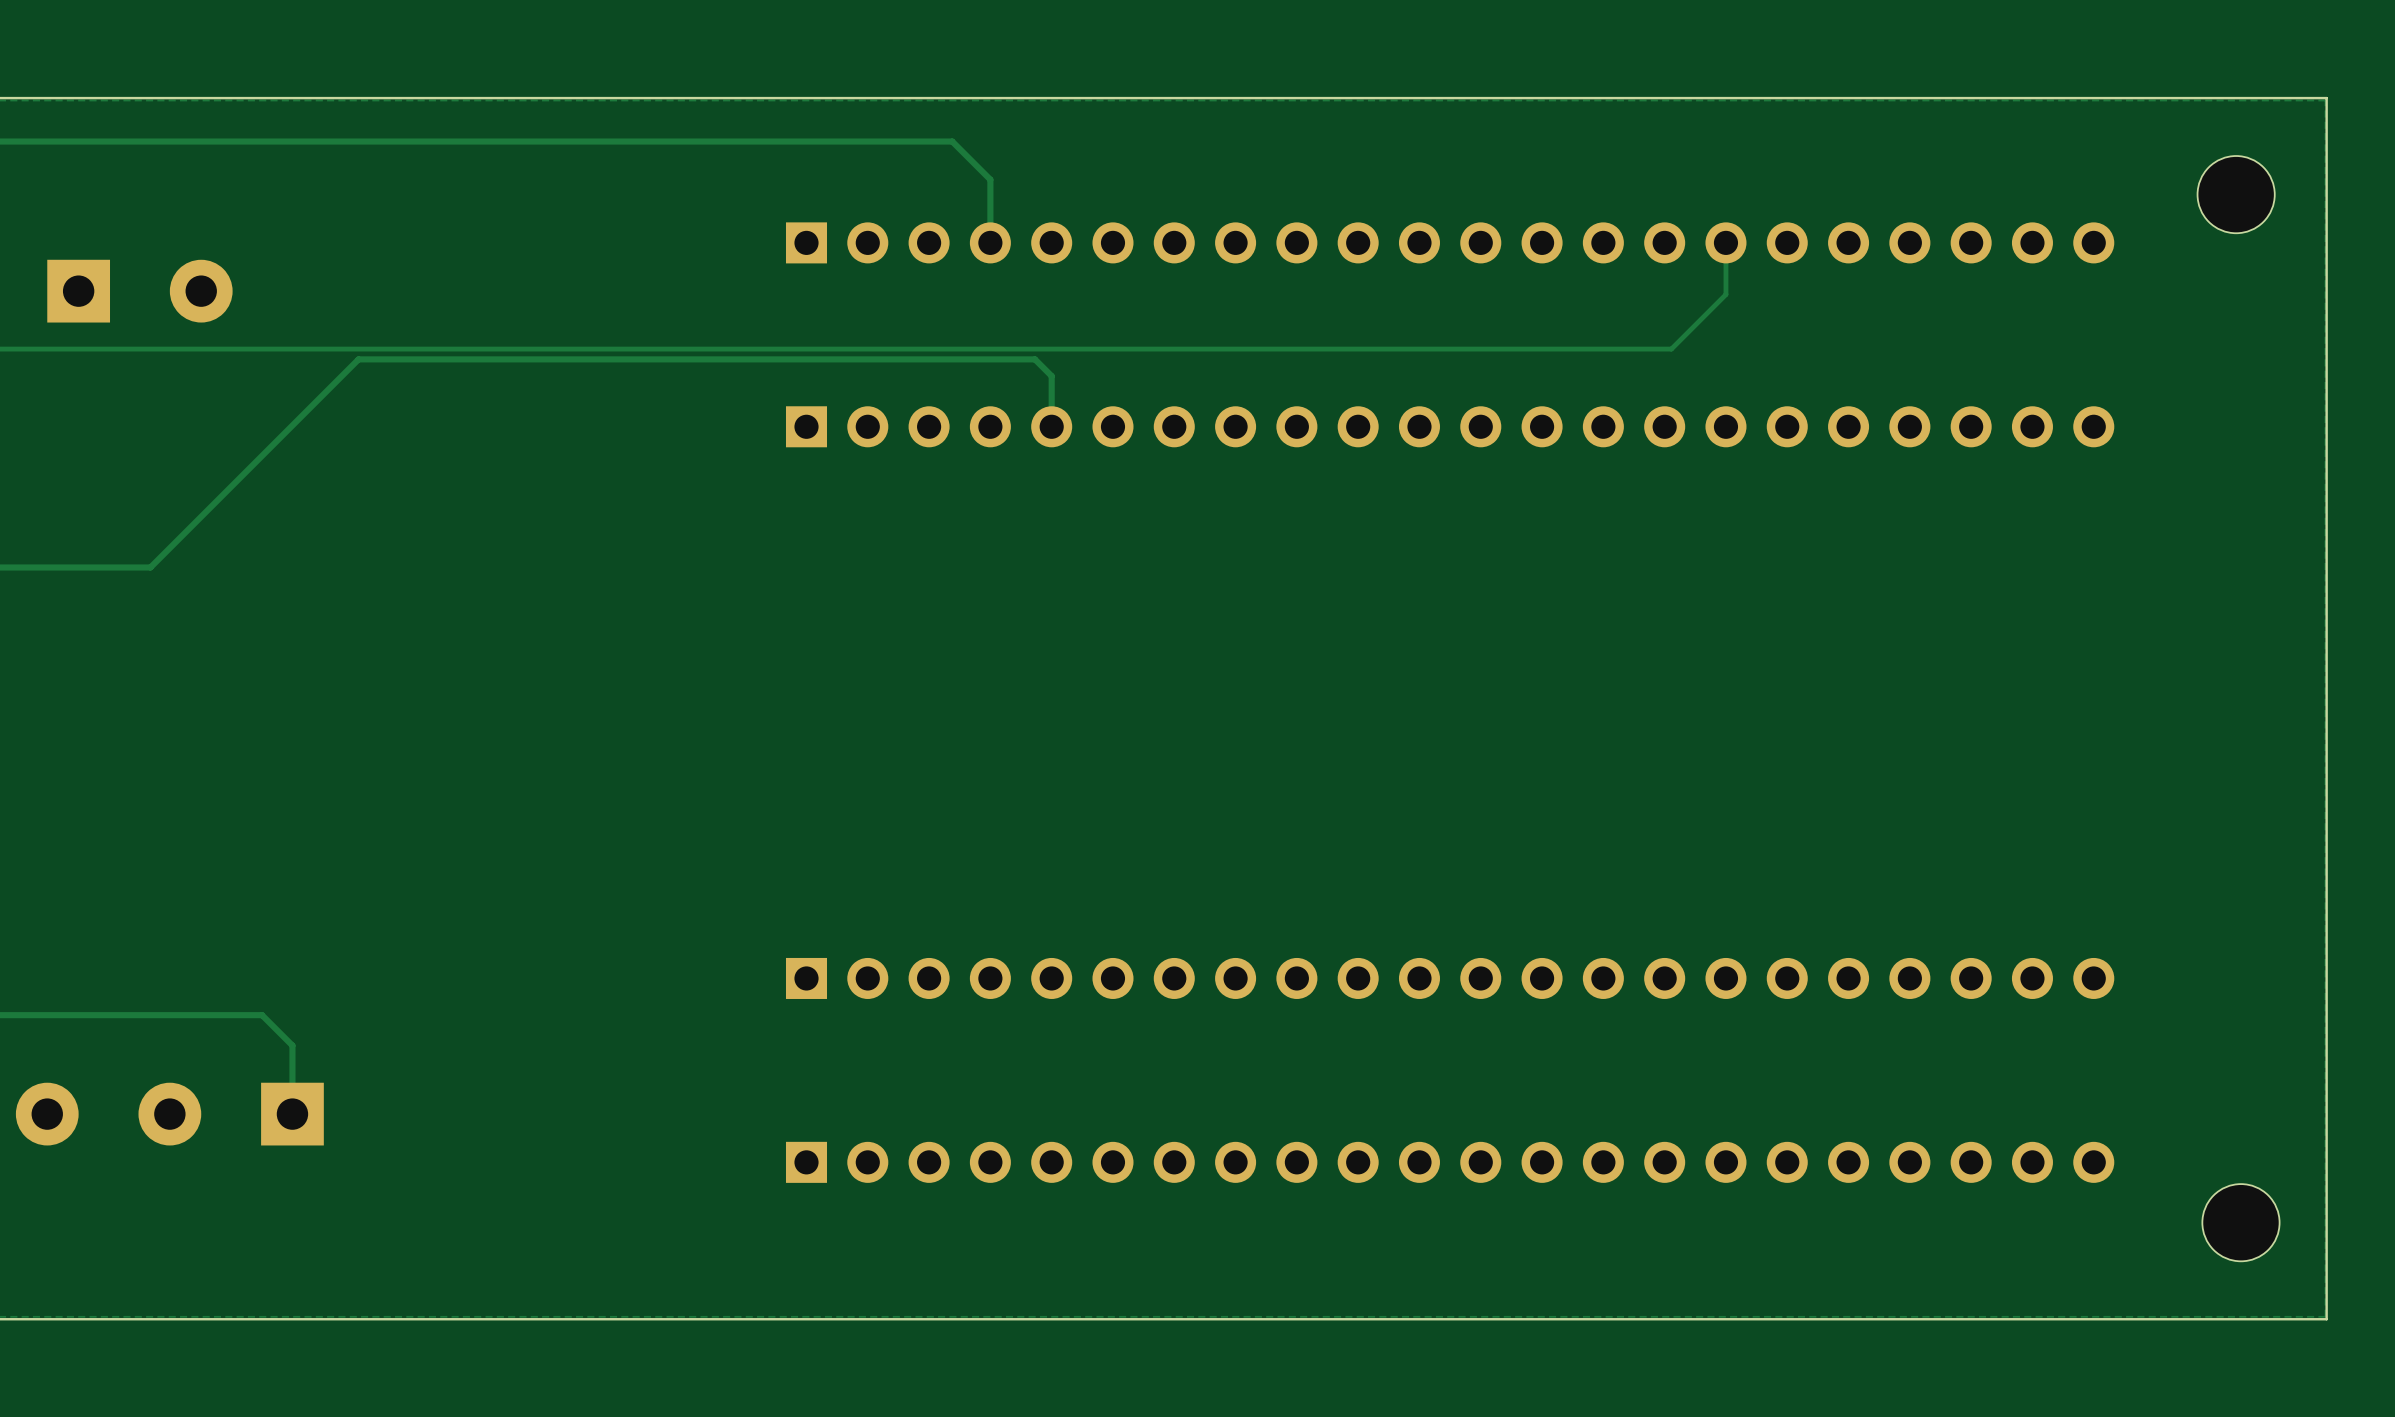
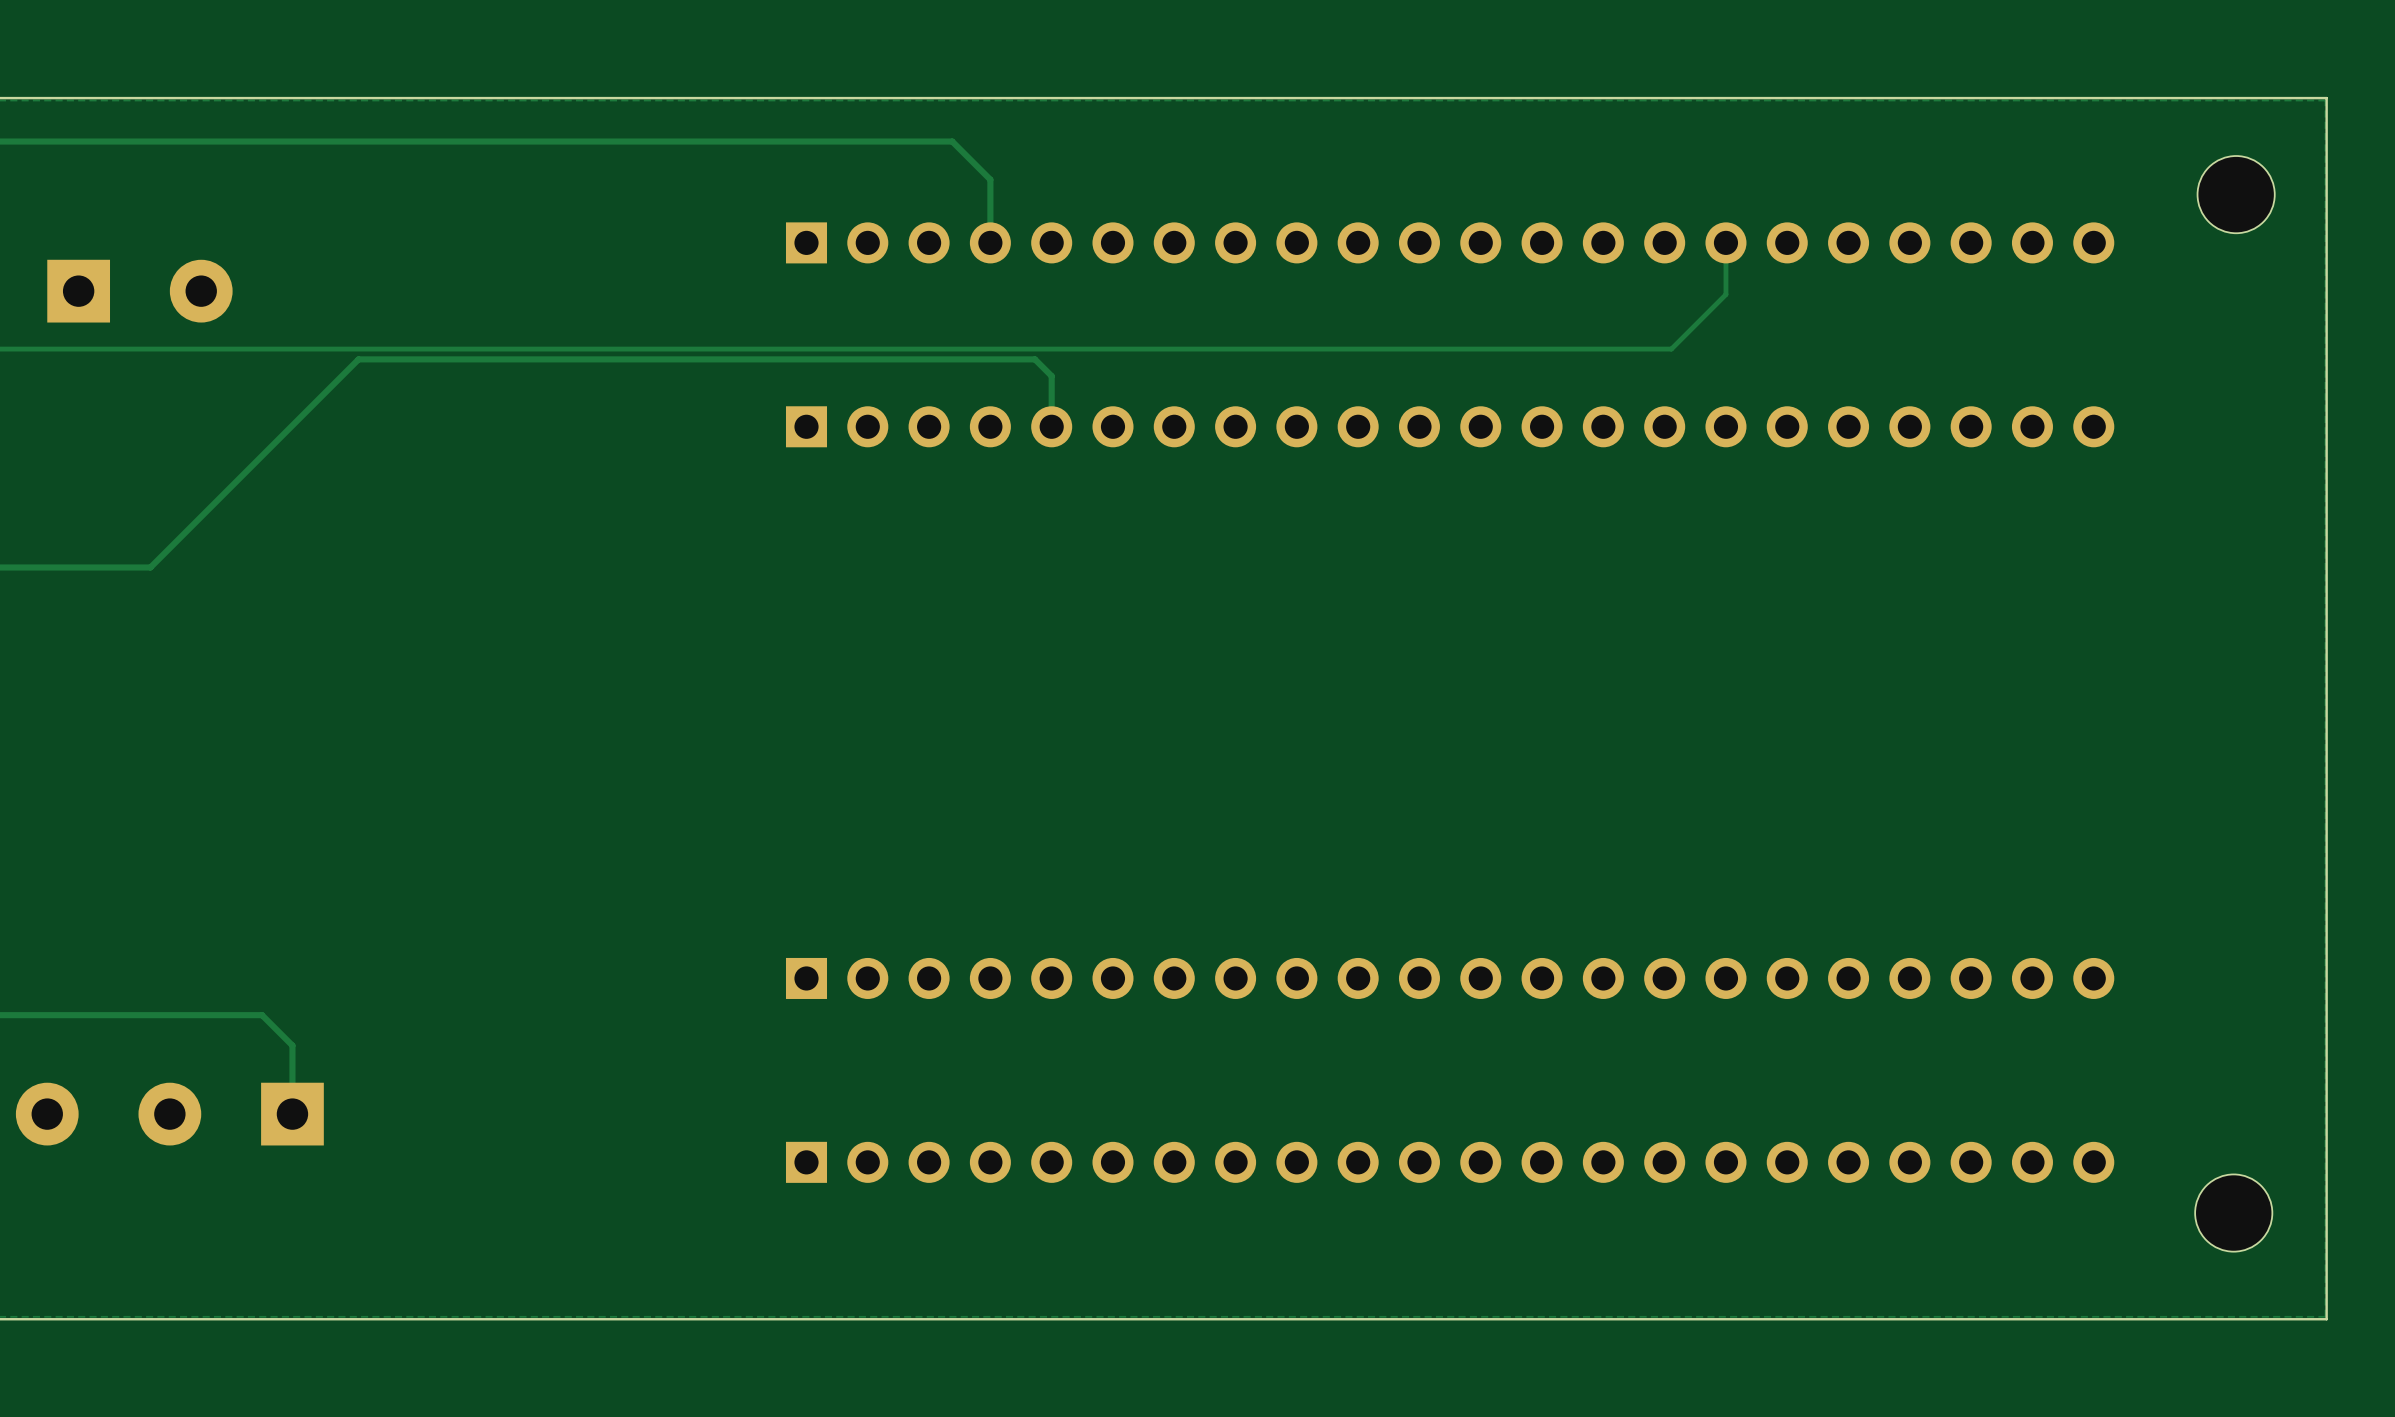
part position: (2240, 1222) -> (2233, 1213)

